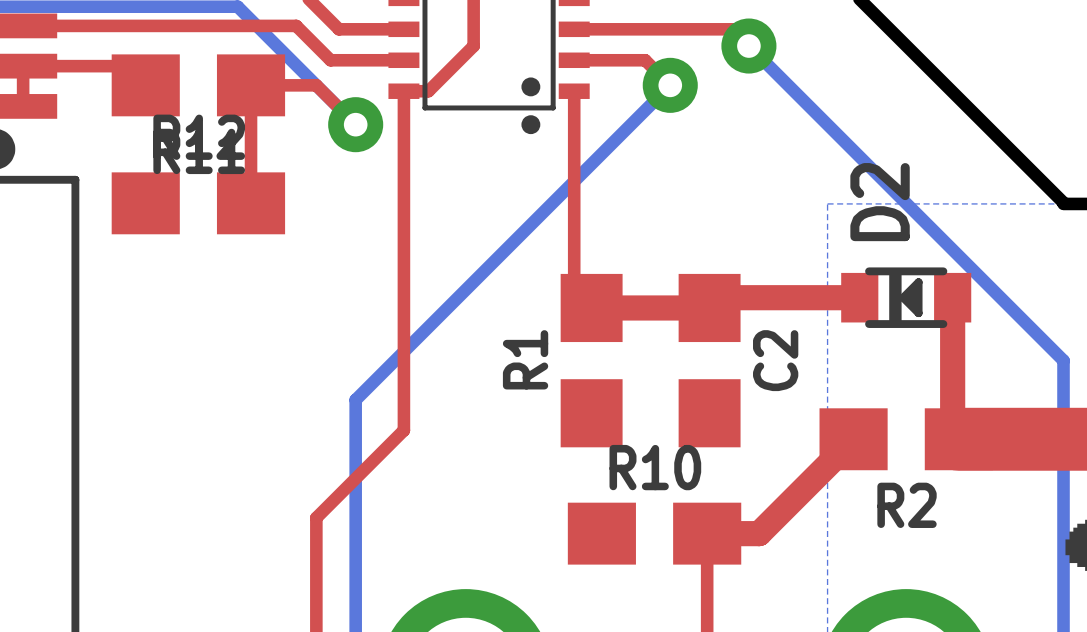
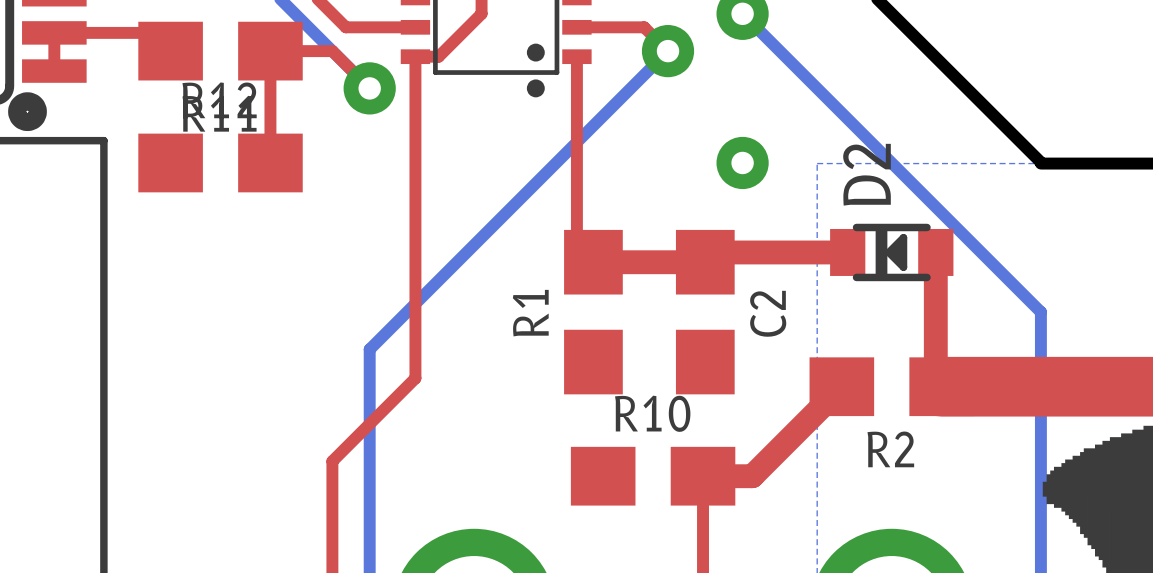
via: none -> (742, 162)

